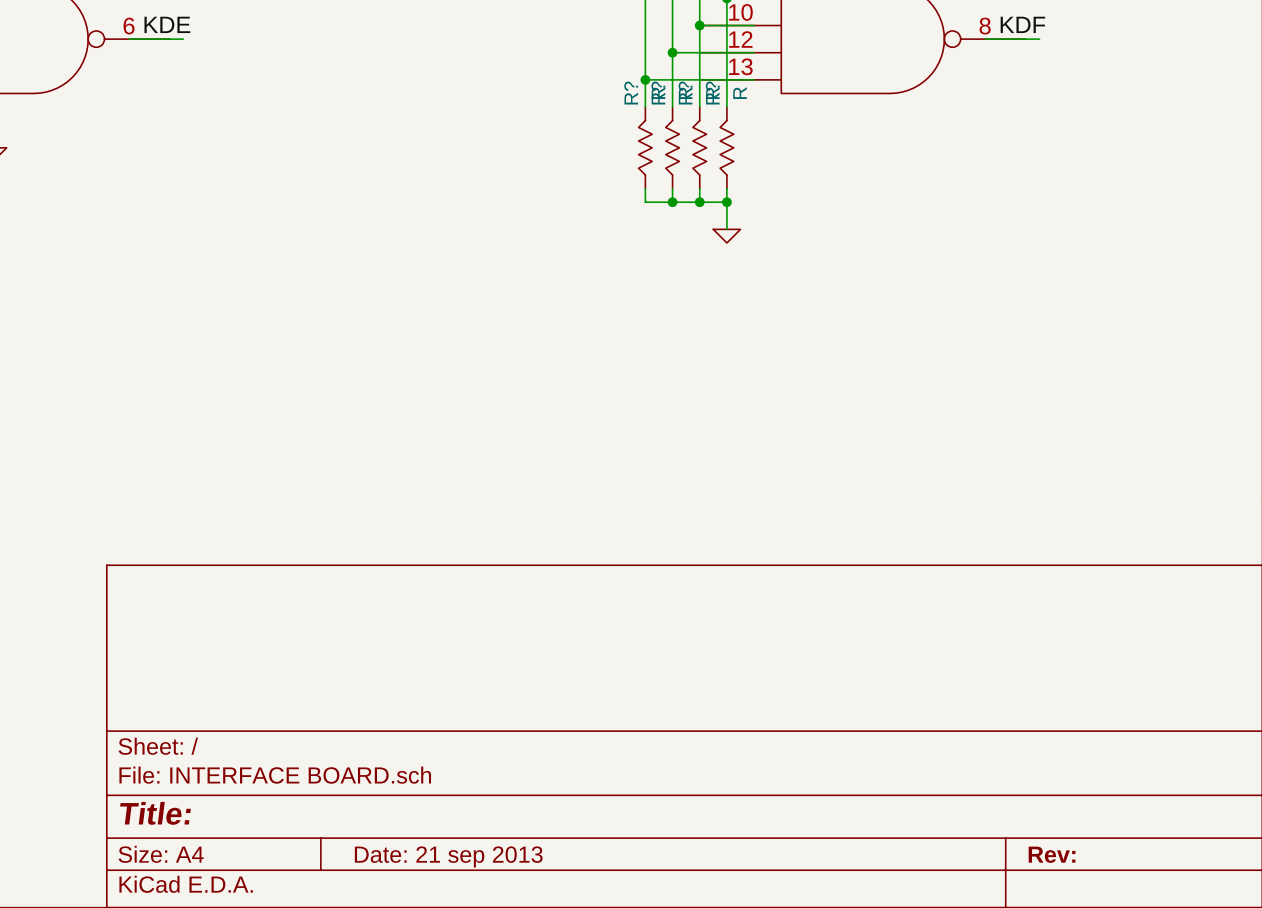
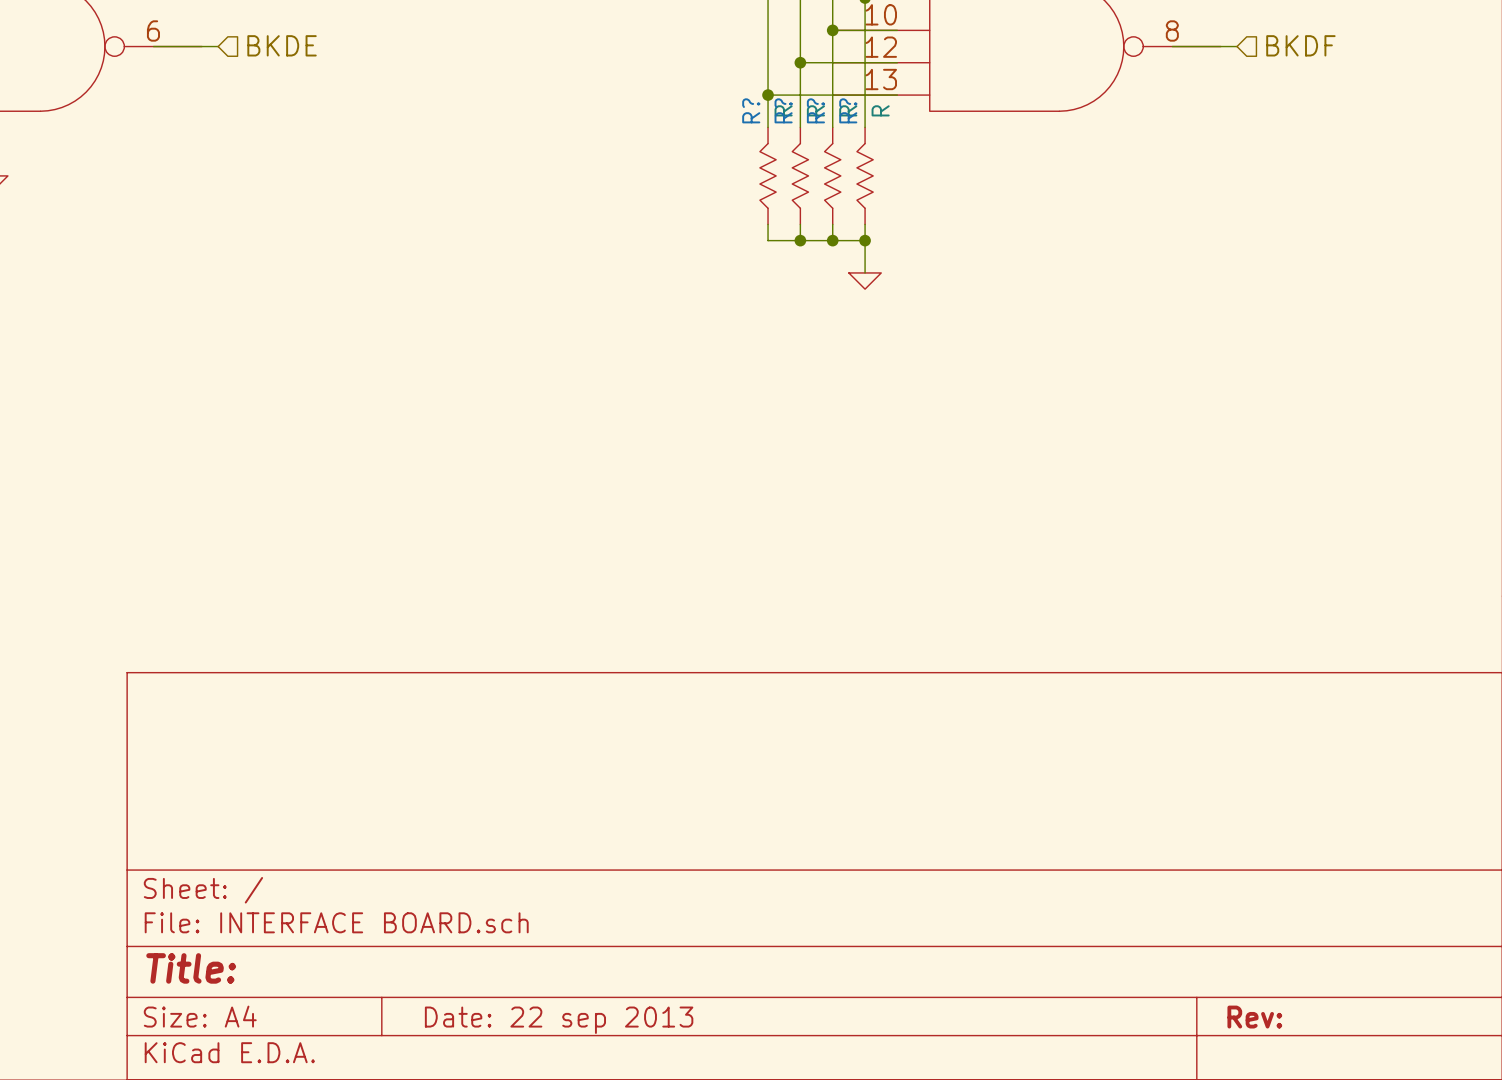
label: KDE (167, 24) -> none
label: KDF (1022, 24) -> none
hierarchical label: none -> BKDE (282, 45)
hierarchical label: none -> BKDF (1300, 45)
title block: Date: 21 sep 2013 (448, 856) -> Date: 22 sep 2013 (559, 1020)

